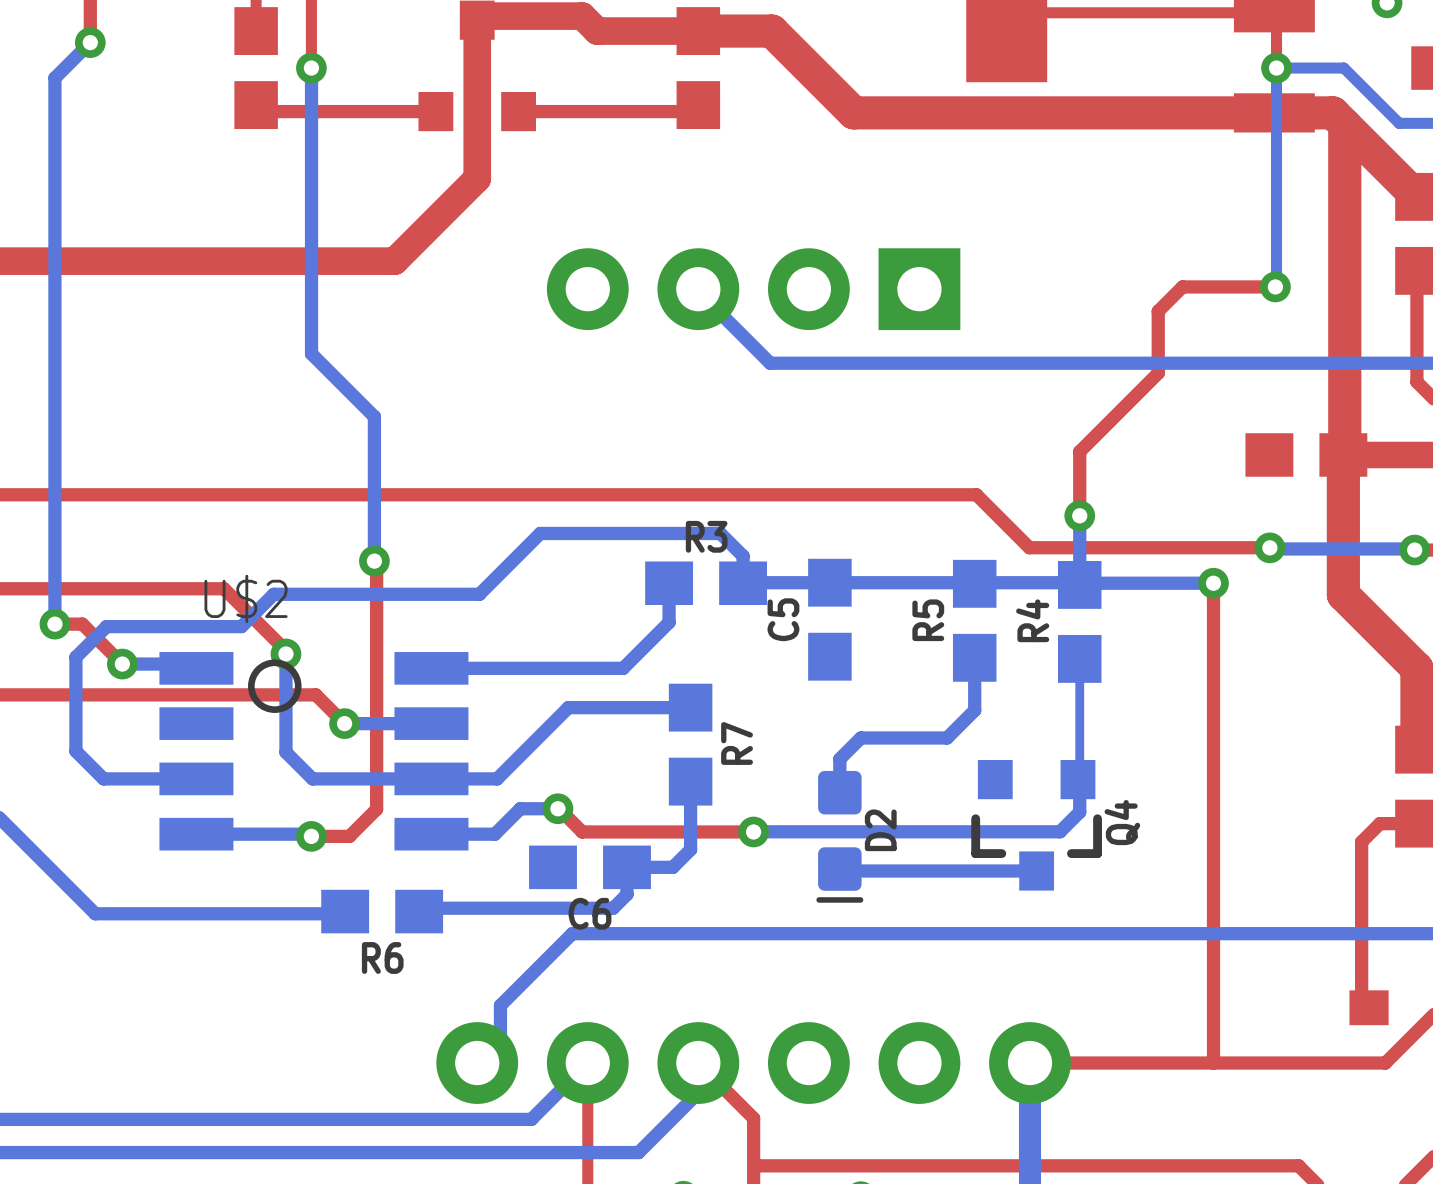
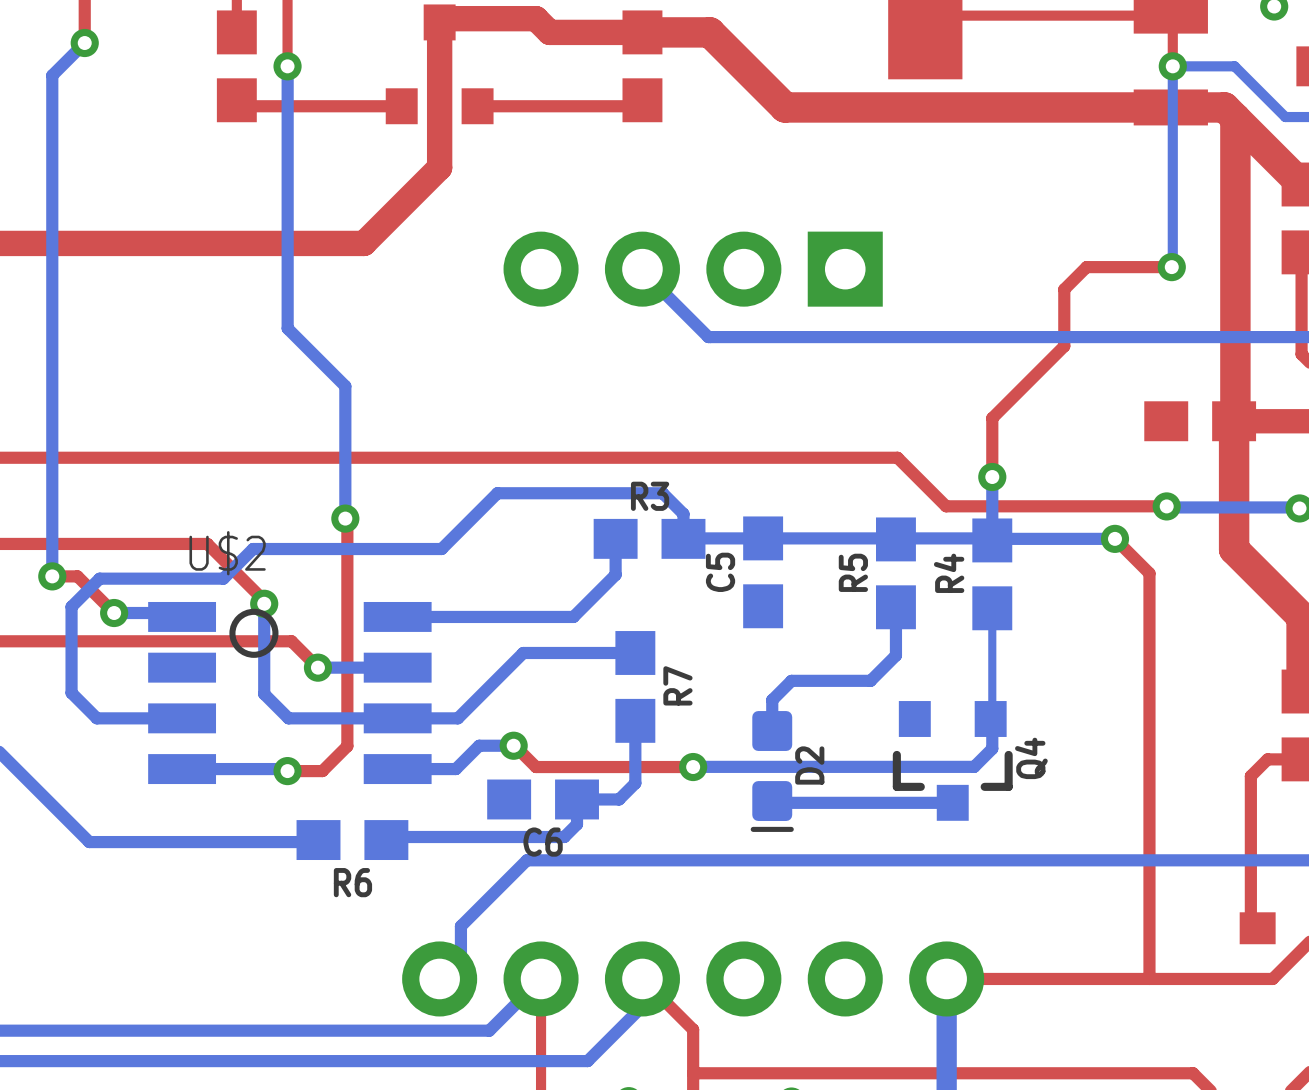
top track: (1213, 583) (1213, 1063) -> (1114, 538) (1149, 573) (1149, 978)

